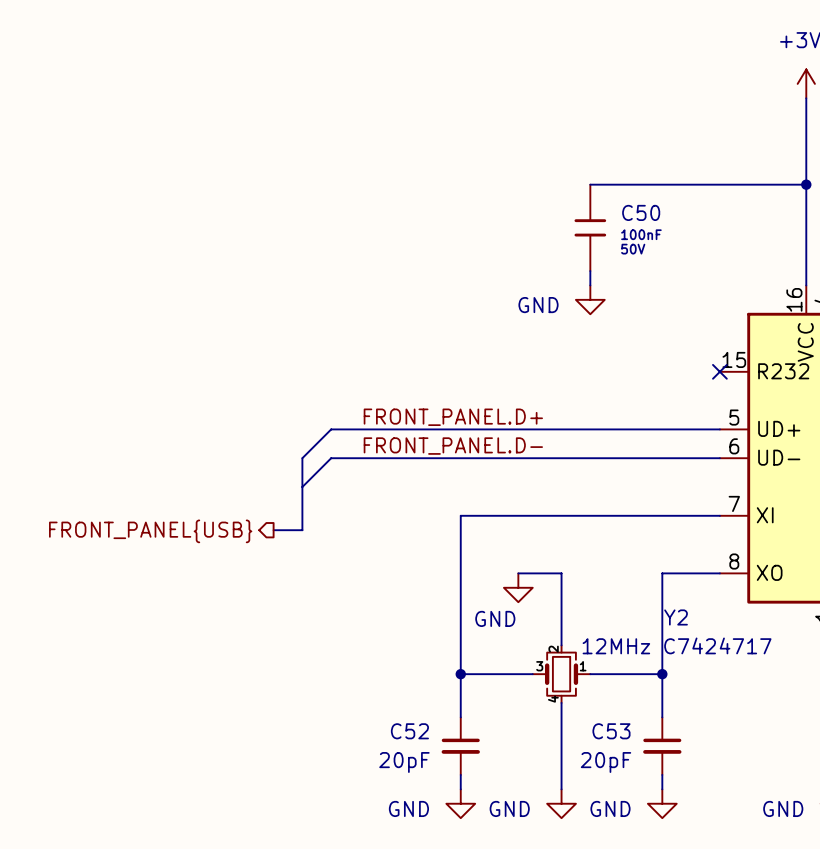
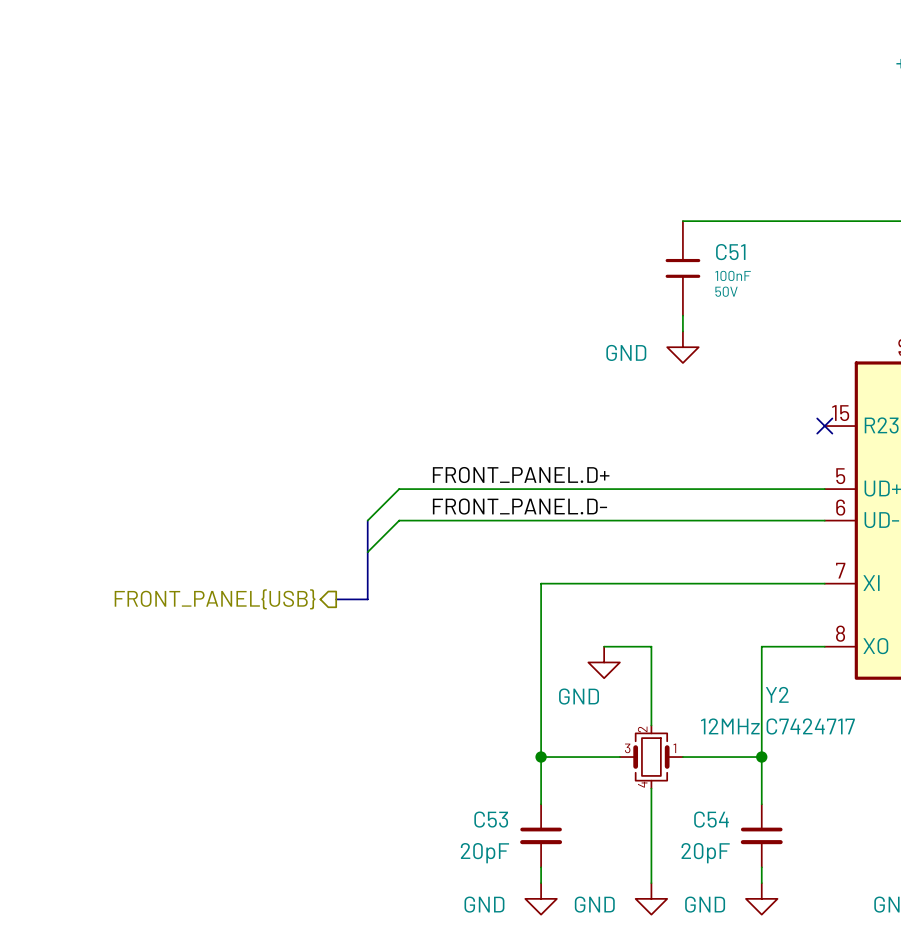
C50 name: C50 (641, 212) -> C51 (730, 252)
C52 name: C52 (409, 731) -> C53 (491, 819)
C53 name: C53 (611, 731) -> C54 (711, 819)

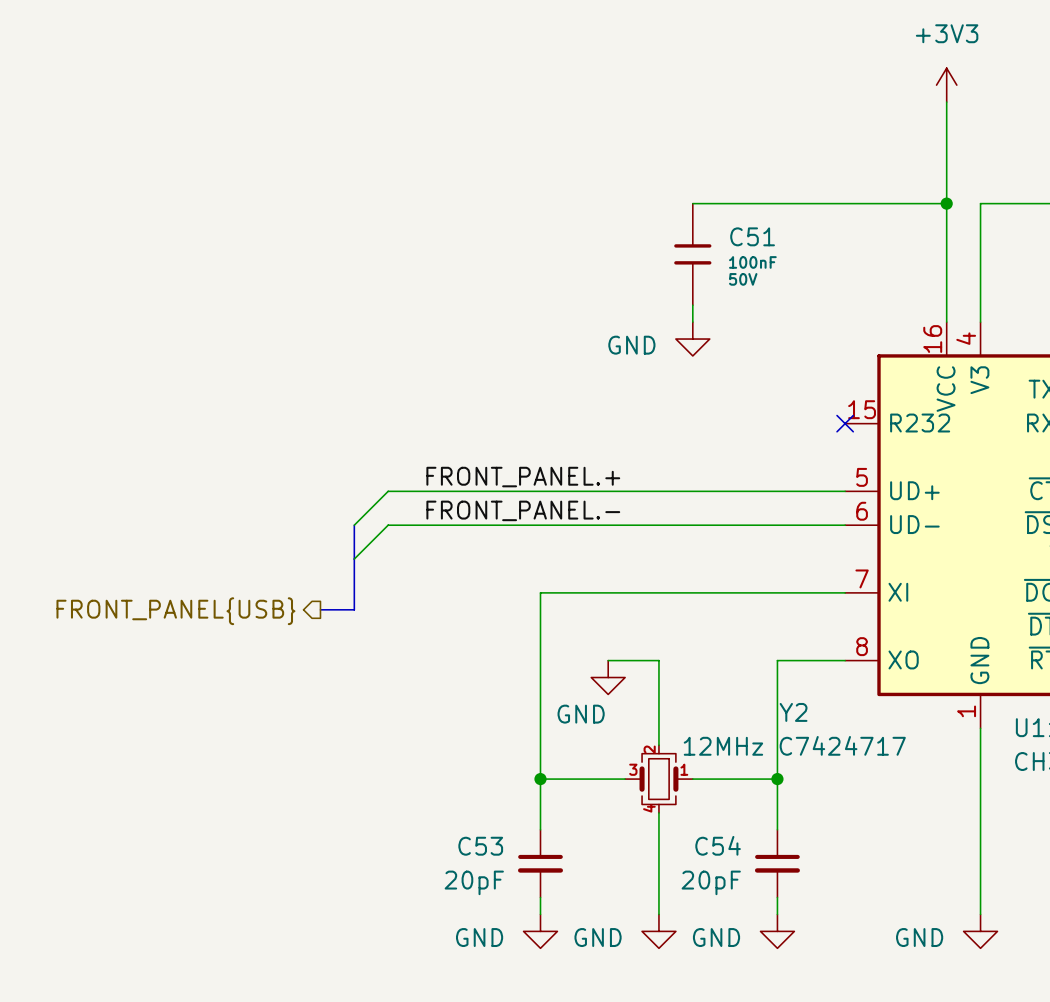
label: FRONT_PANEL.D+ (521, 475) -> FRONT_PANEL.+ (523, 477)
label: FRONT_PANEL.D- (519, 506) -> FRONT_PANEL.- (523, 510)

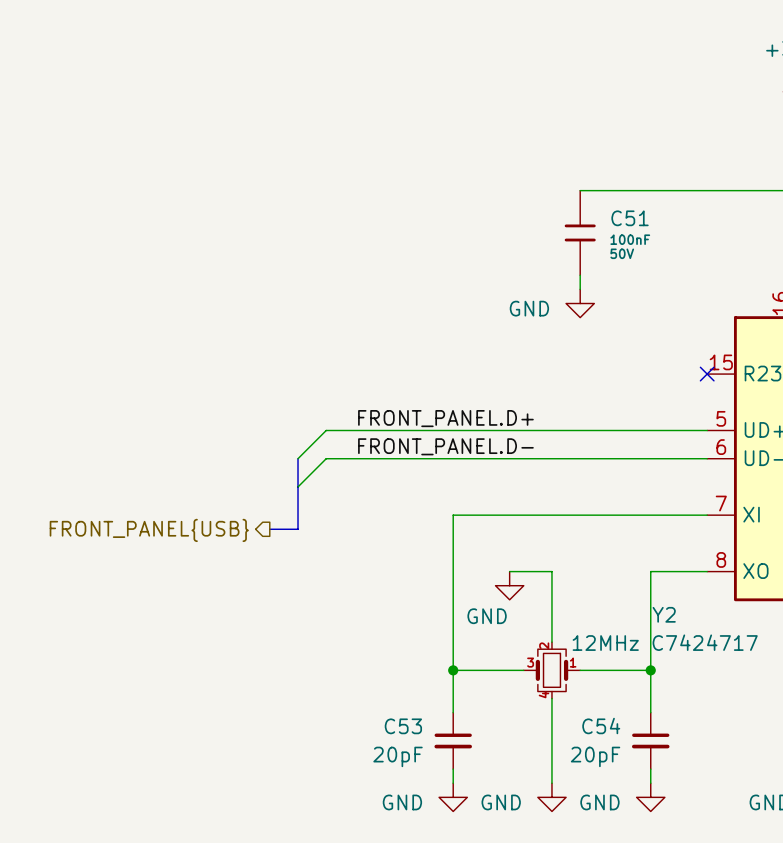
label: FRONT_PANEL.+ (523, 477) -> FRONT_PANEL.D+ (445, 418)
label: FRONT_PANEL.- (523, 510) -> FRONT_PANEL.D- (445, 446)

